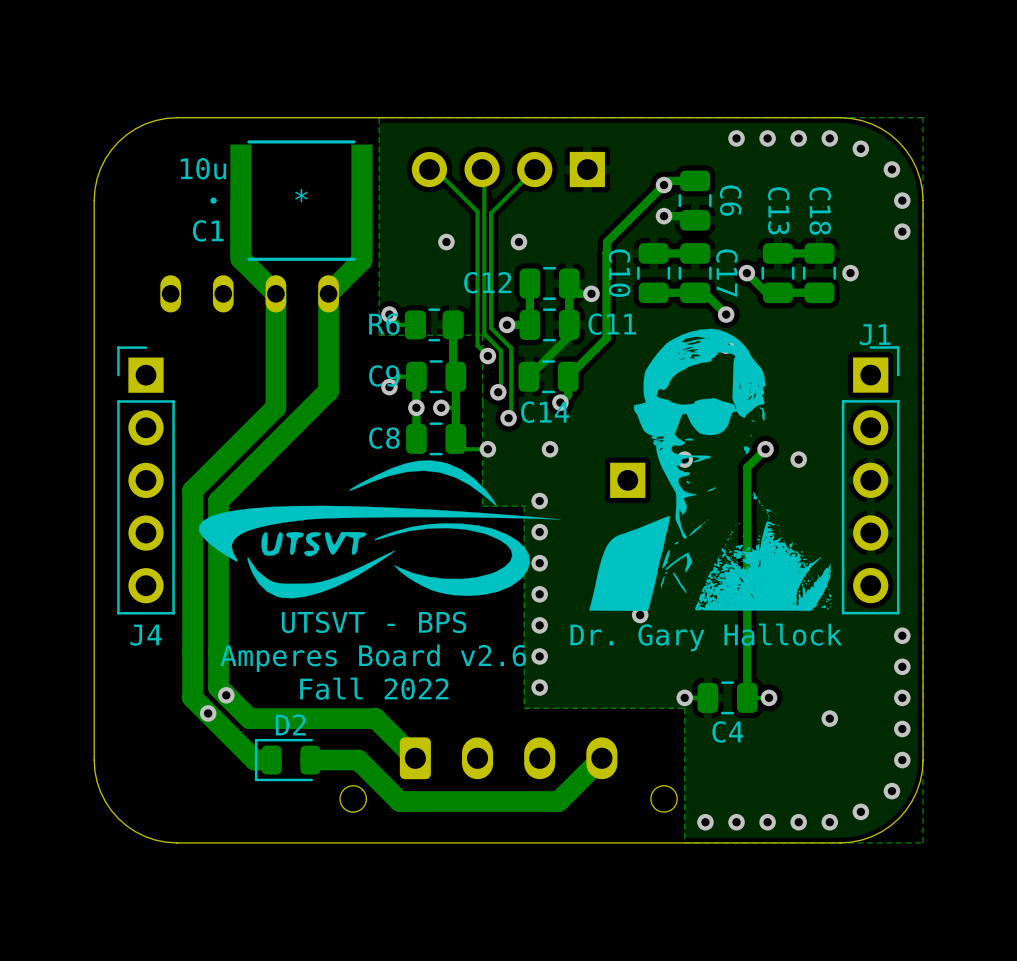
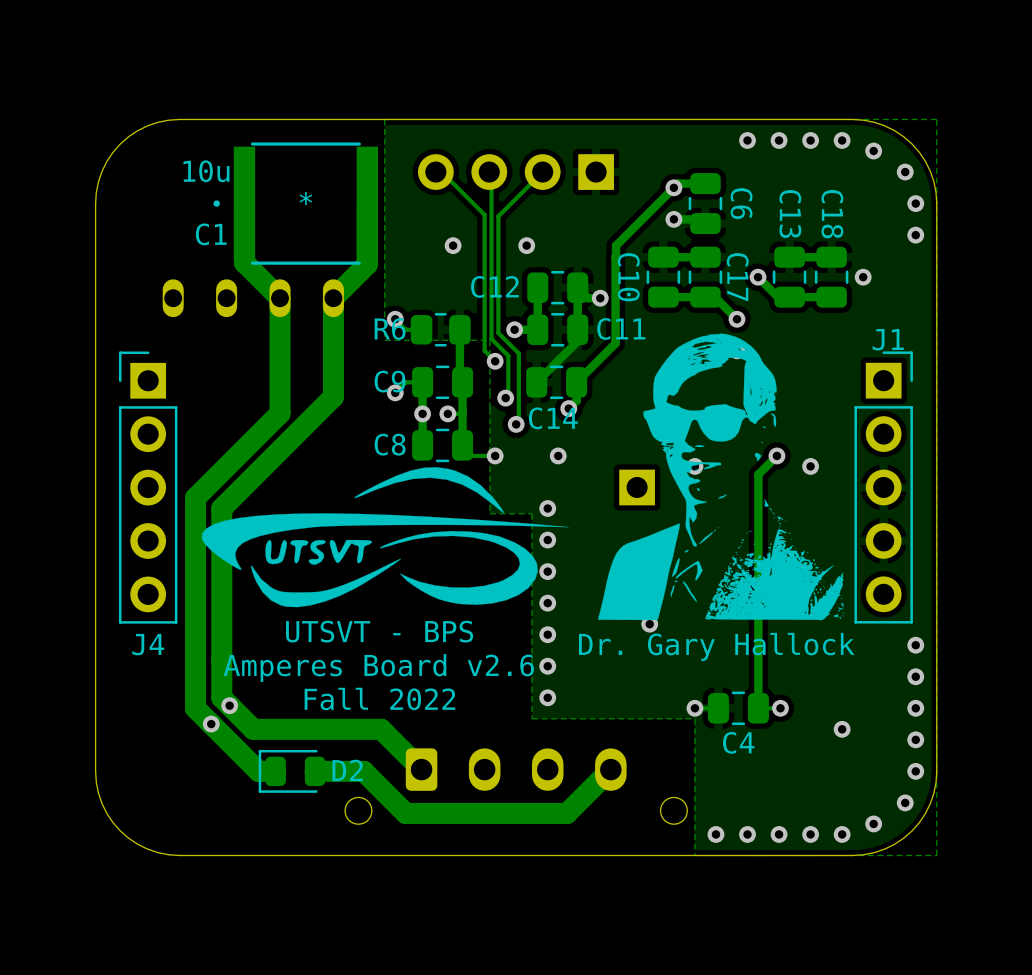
D2 name position: D2 (290, 724) -> D2 (347, 770)

